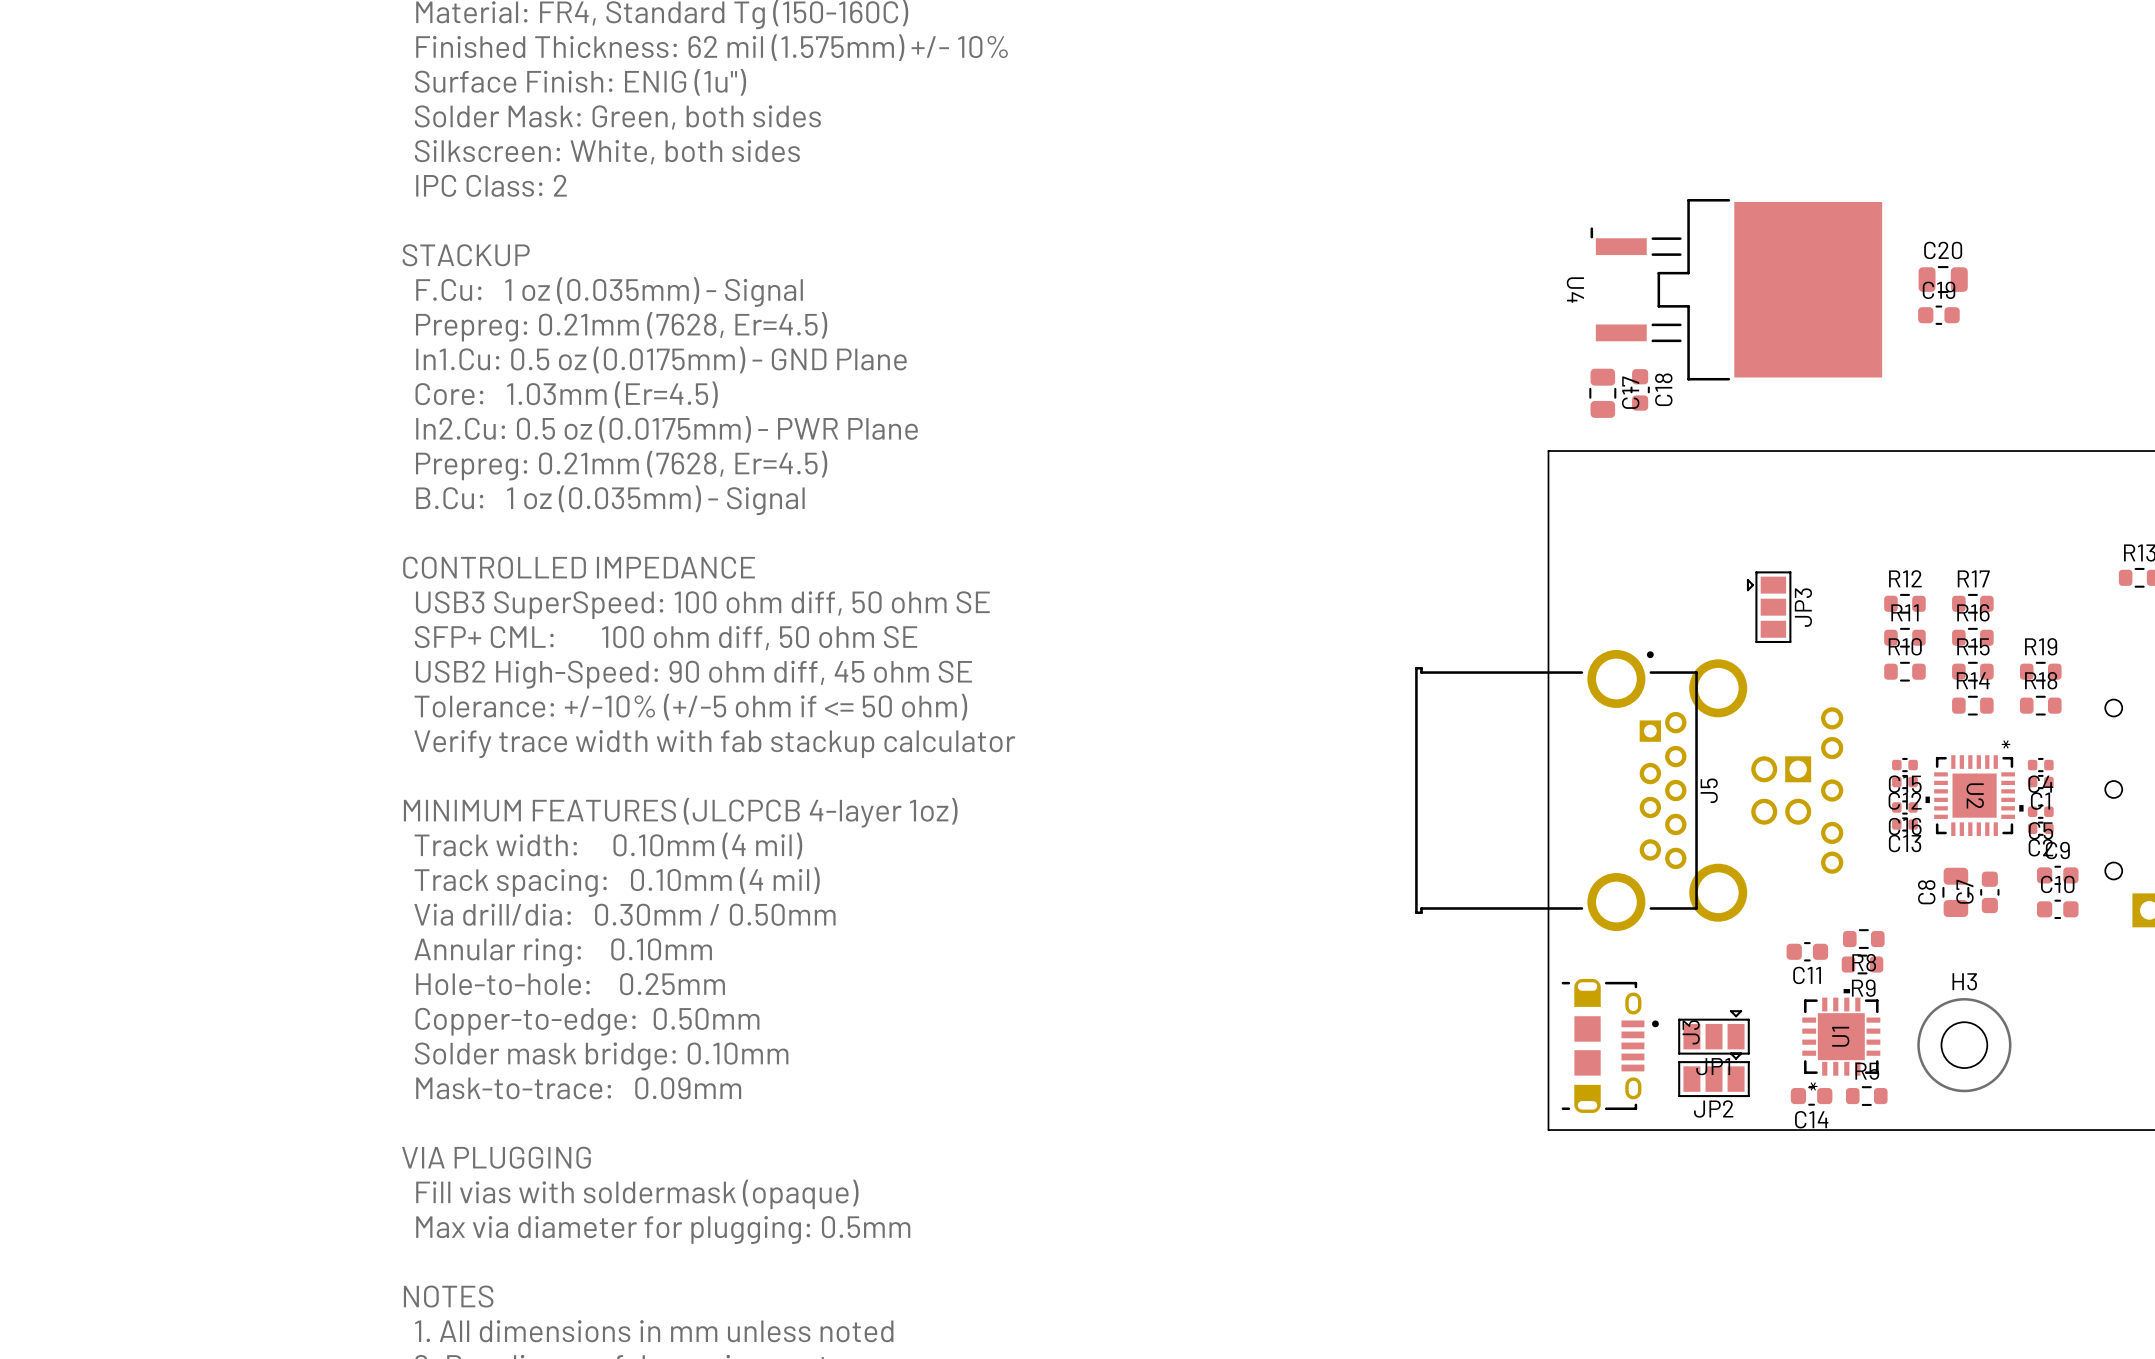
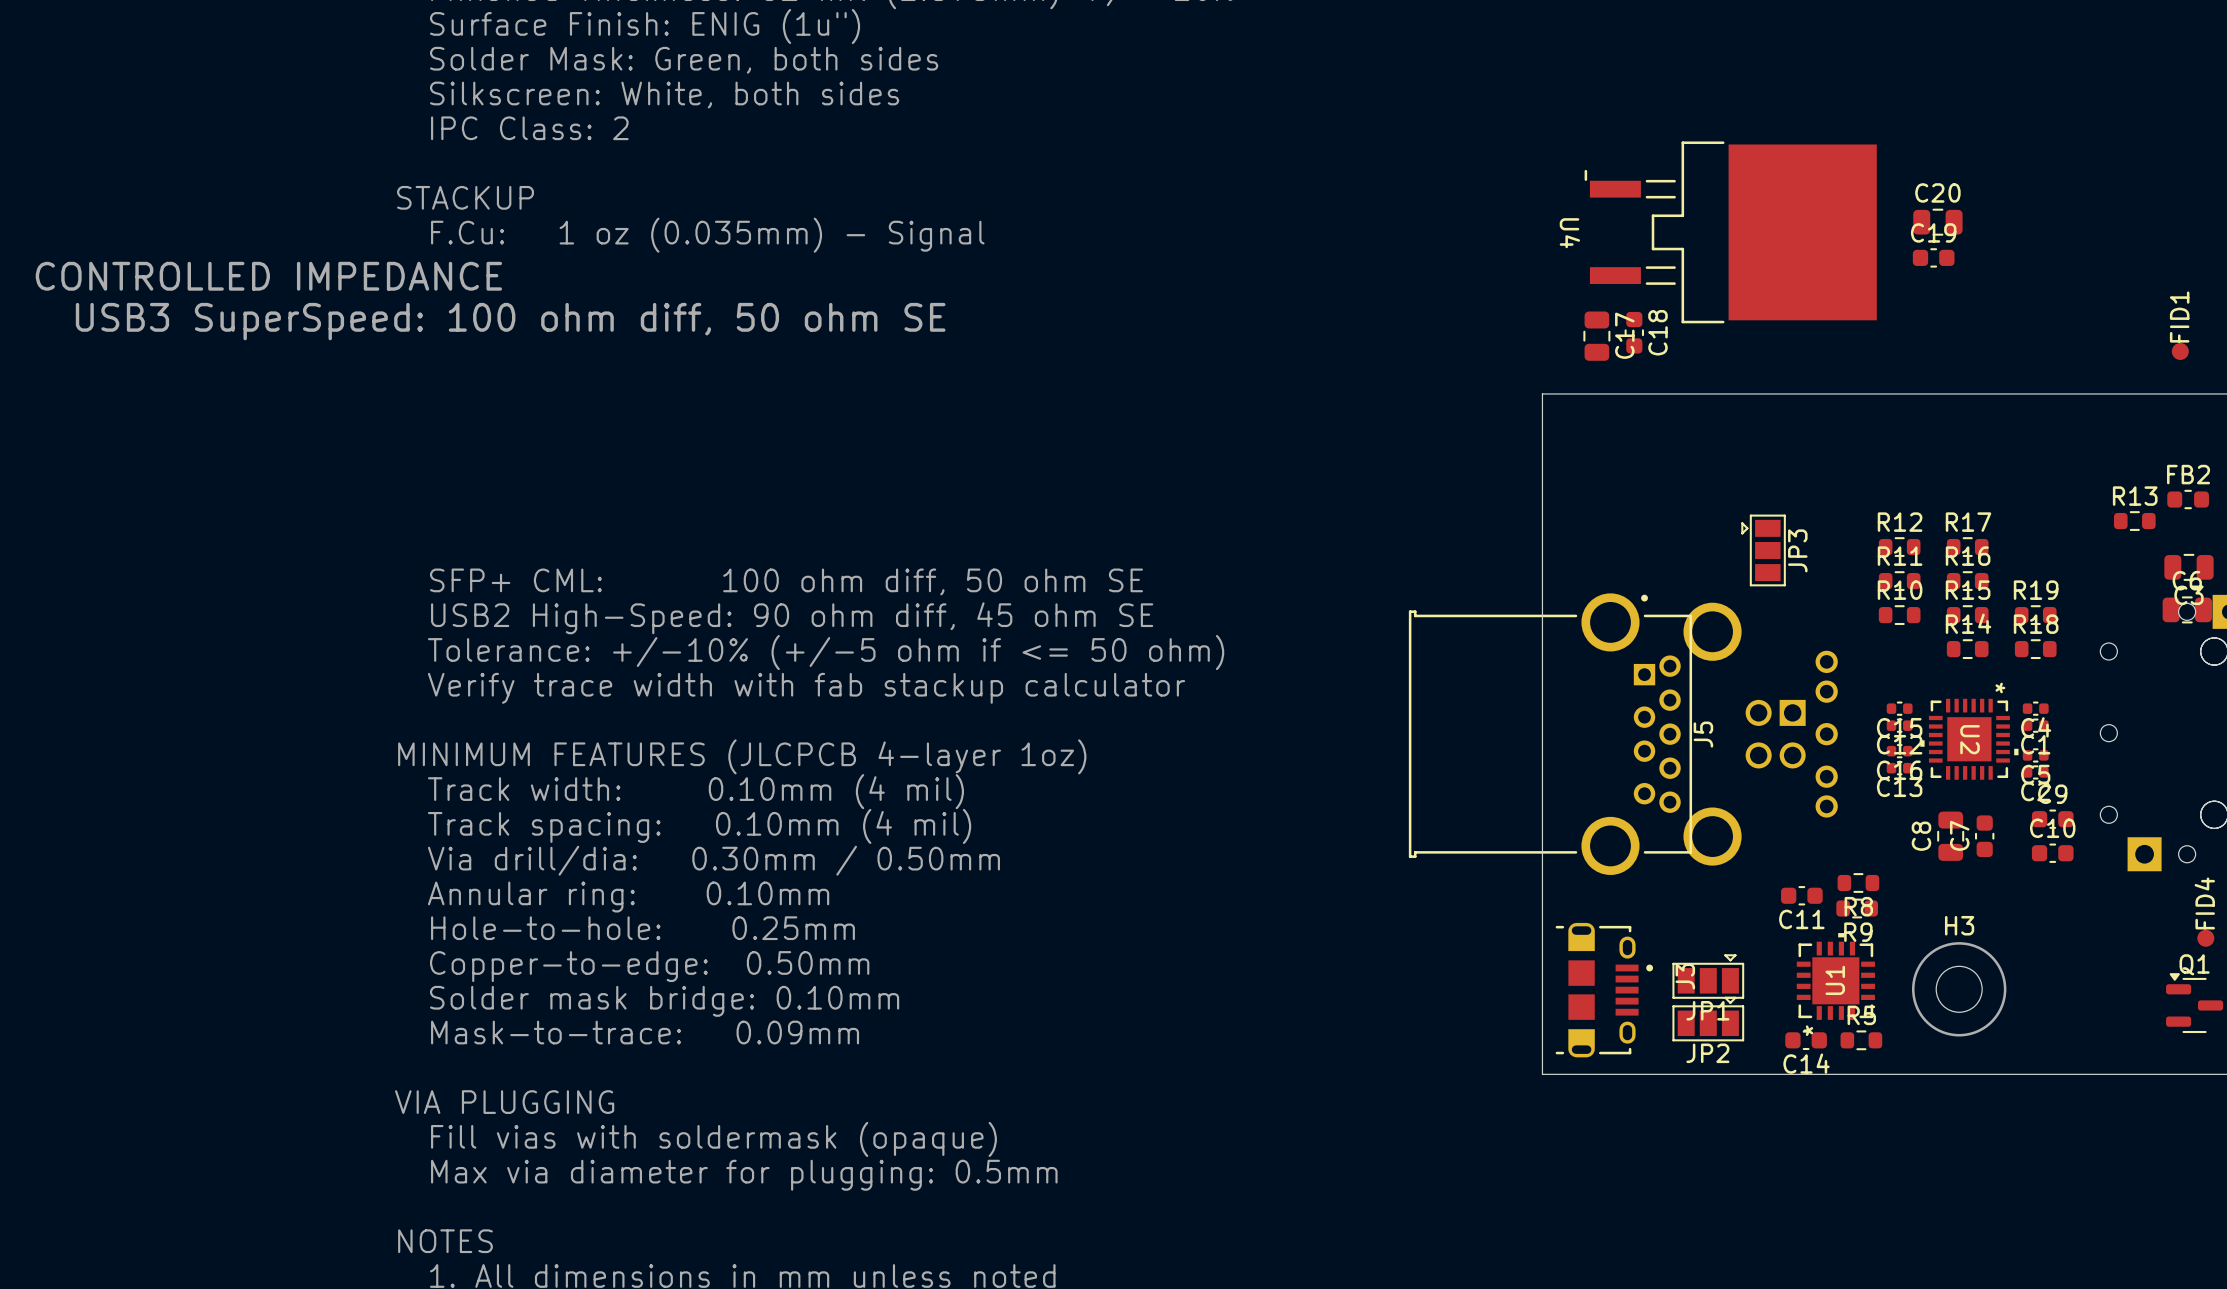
text: Prepreg: 0.21mm (7628, Er=4.5) (621, 326) -> none
text: none -> CONTROLLED IMPEDANCE (268, 276)
text: In1.Cu: 0.5 oz (0.0175mm) - GND Plane (661, 360) -> none
text: none -> USB3 SuperSpeed: 100 ohm diff, 50 ohm SE (510, 321)
text: Core: 1.03mm (Er=4.5) (566, 394) -> none
text: In2.Cu: 0.5 oz (0.0175mm) - PWR Plane (667, 429) -> none
text: Prepreg: 0.21mm (7628, Er=4.5) (621, 465) -> none
text: B.Cu: 1 oz (0.035mm) - Signal (610, 500) -> none
text: CONTROLLED IMPEDANCE (579, 567) -> none
text: USB3 SuperSpeed: 100 ohm diff, 50 ohm SE (702, 605) -> none

